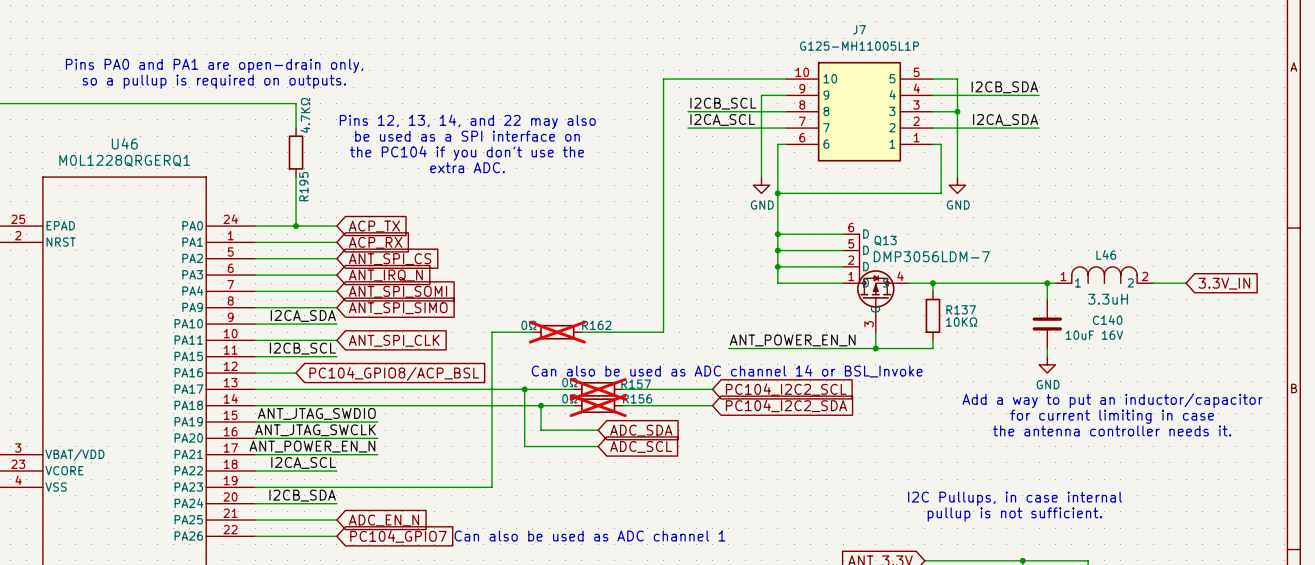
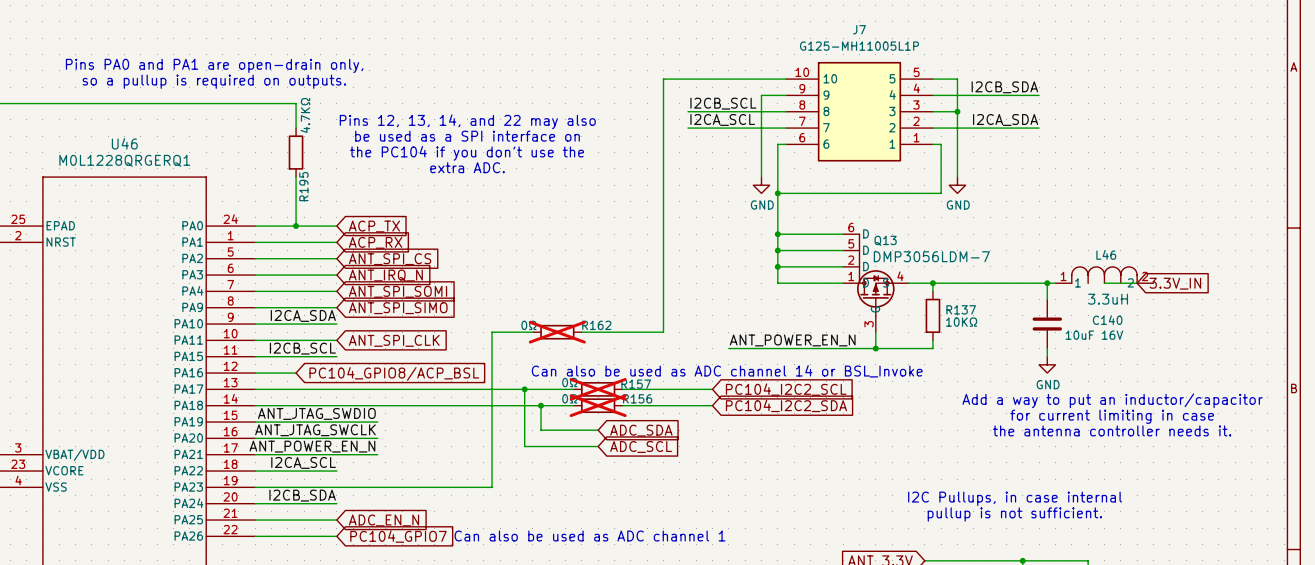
wire: (1153, 283) (1186, 283) -> (1104, 283) (1137, 283)
global label position: 3.3V_IN (1224, 283) -> 3.3V_IN (1175, 283)

